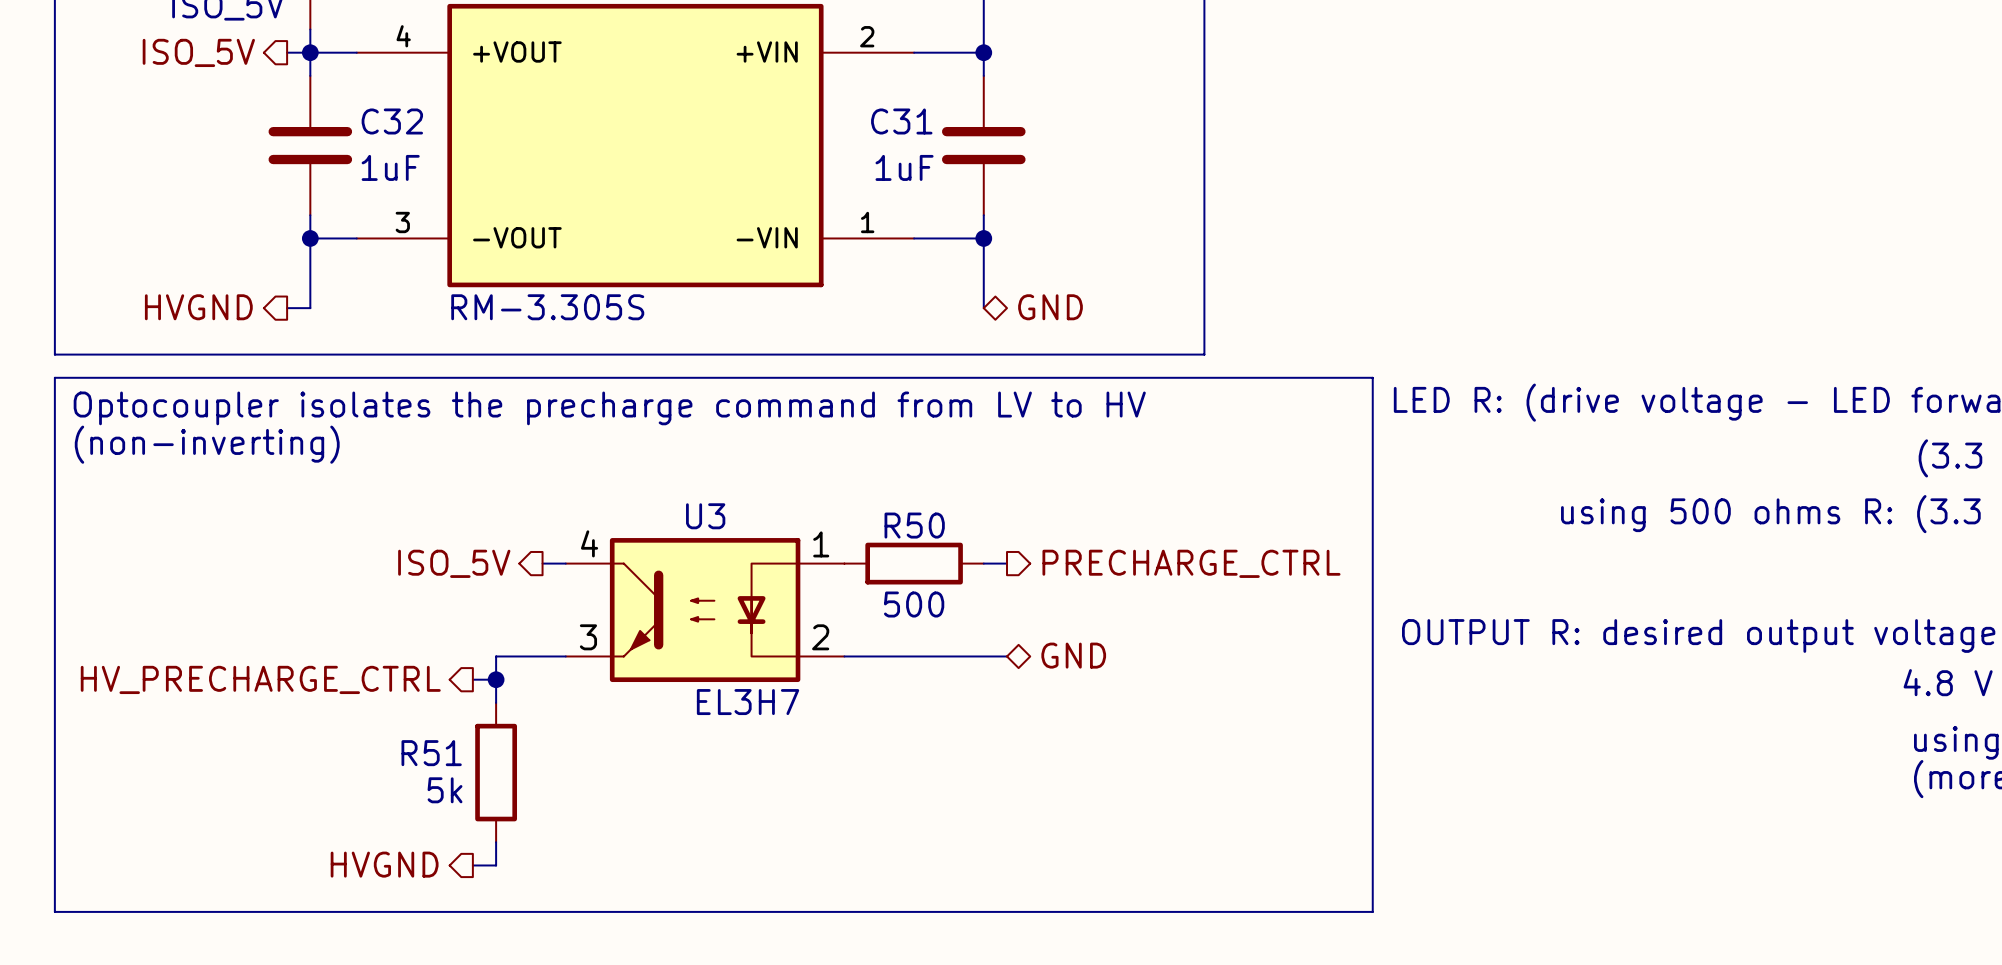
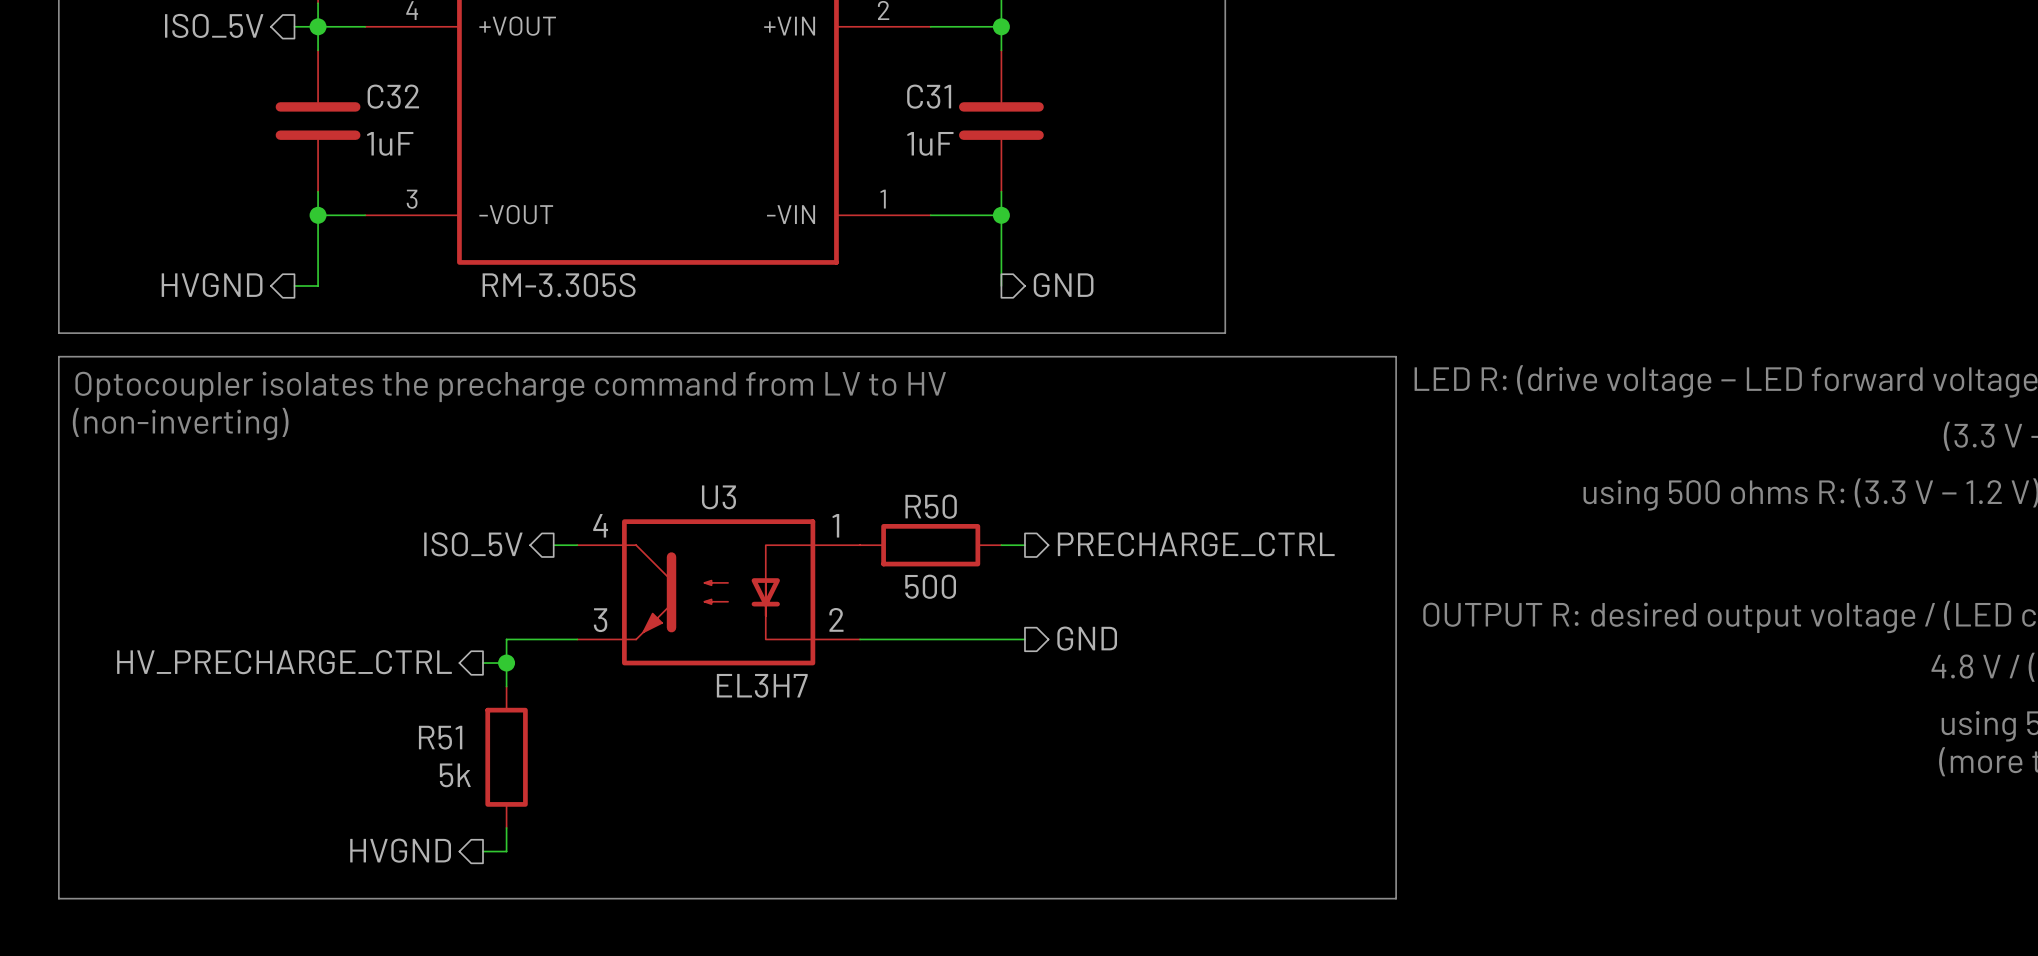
hierarchical label shape: bidirectional (1050, 307) -> output (1063, 285)
hierarchical label shape: bidirectional (1073, 655) -> output (1087, 638)

